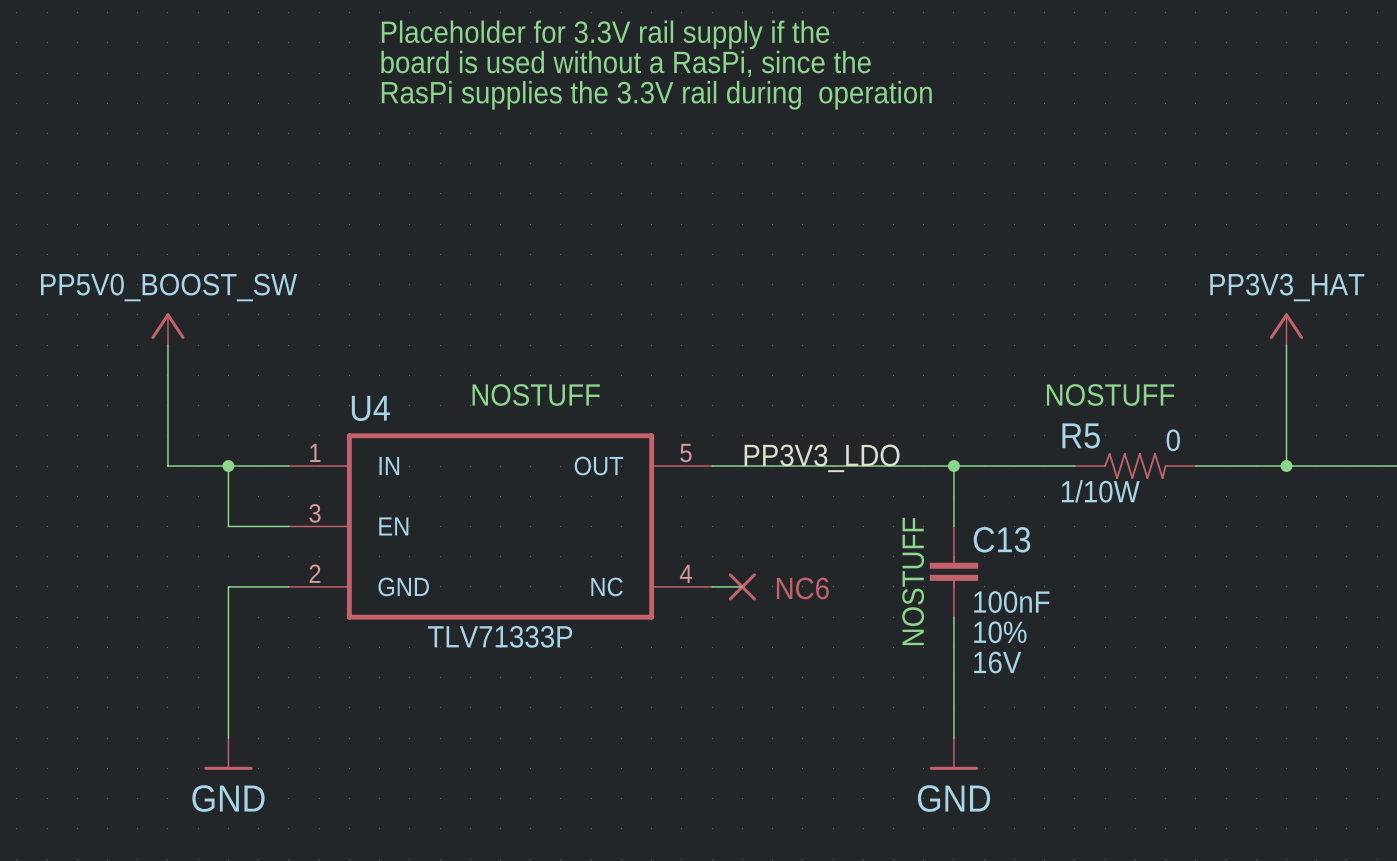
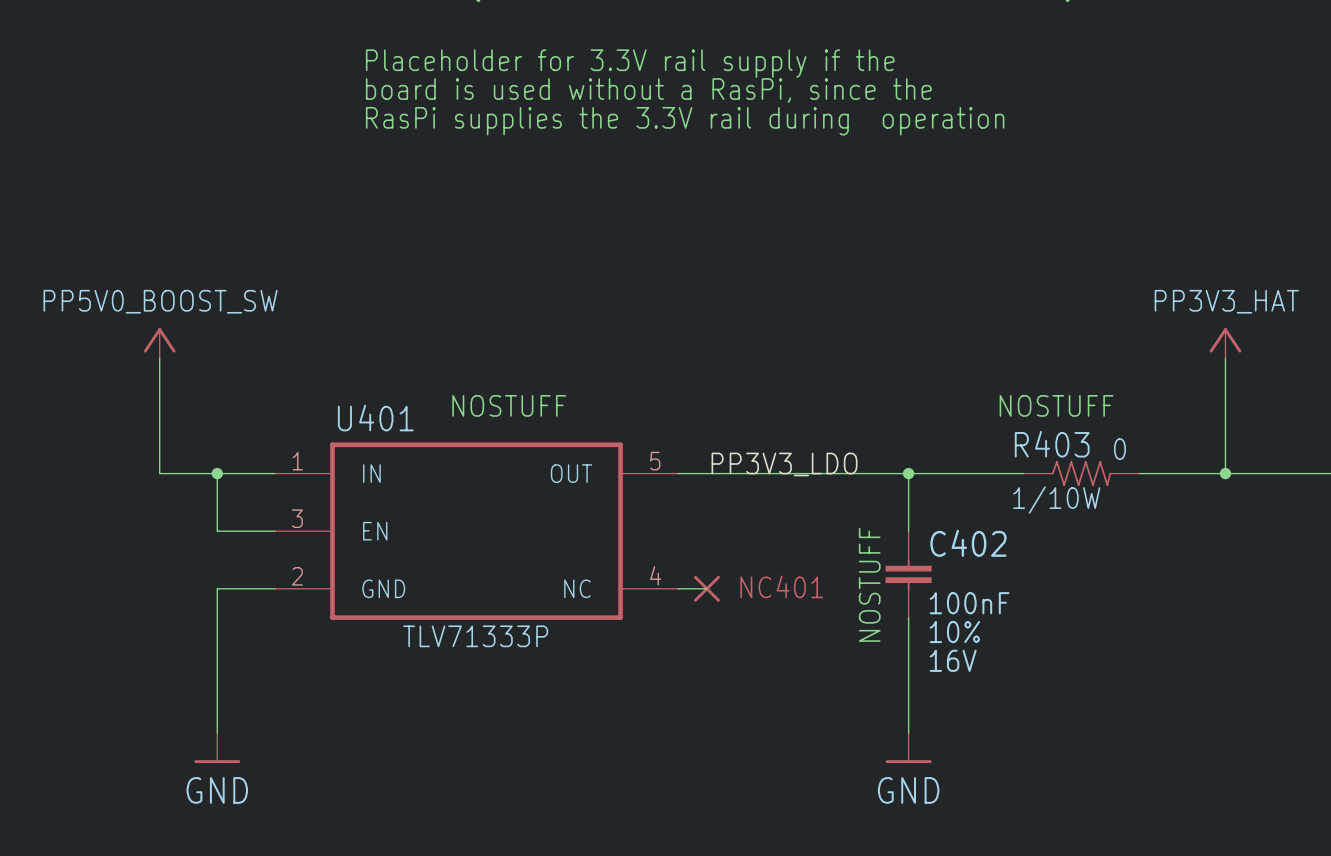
U4 name: U4 (370, 408) -> U401 (375, 418)
R5 name: R5 (1081, 435) -> R403 (1052, 444)
C13 name: C13 (1001, 539) -> C402 (968, 543)
NC6 name: NC6 (802, 588) -> NC401 (781, 586)

